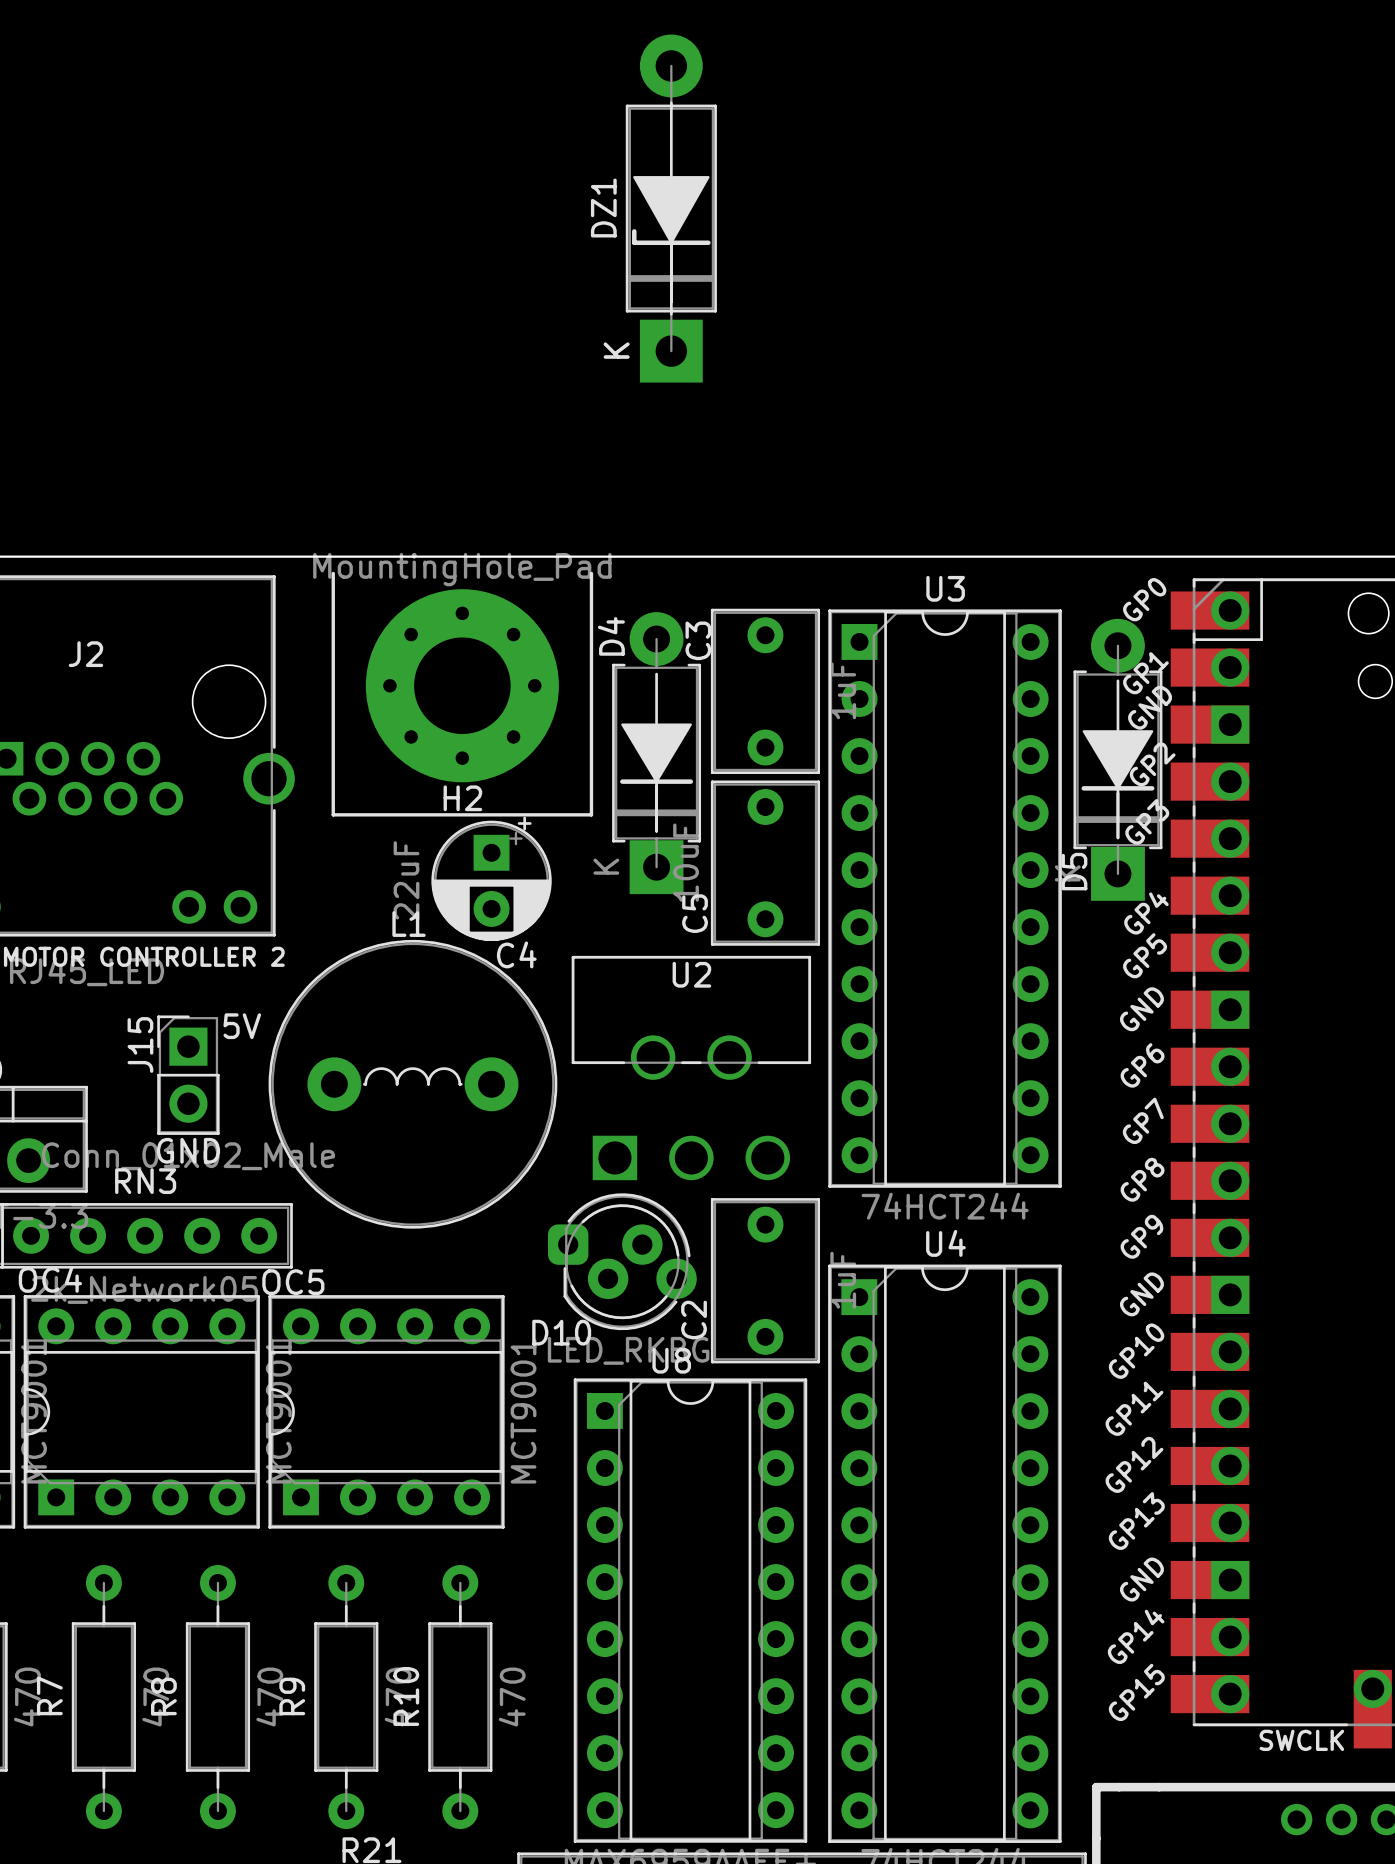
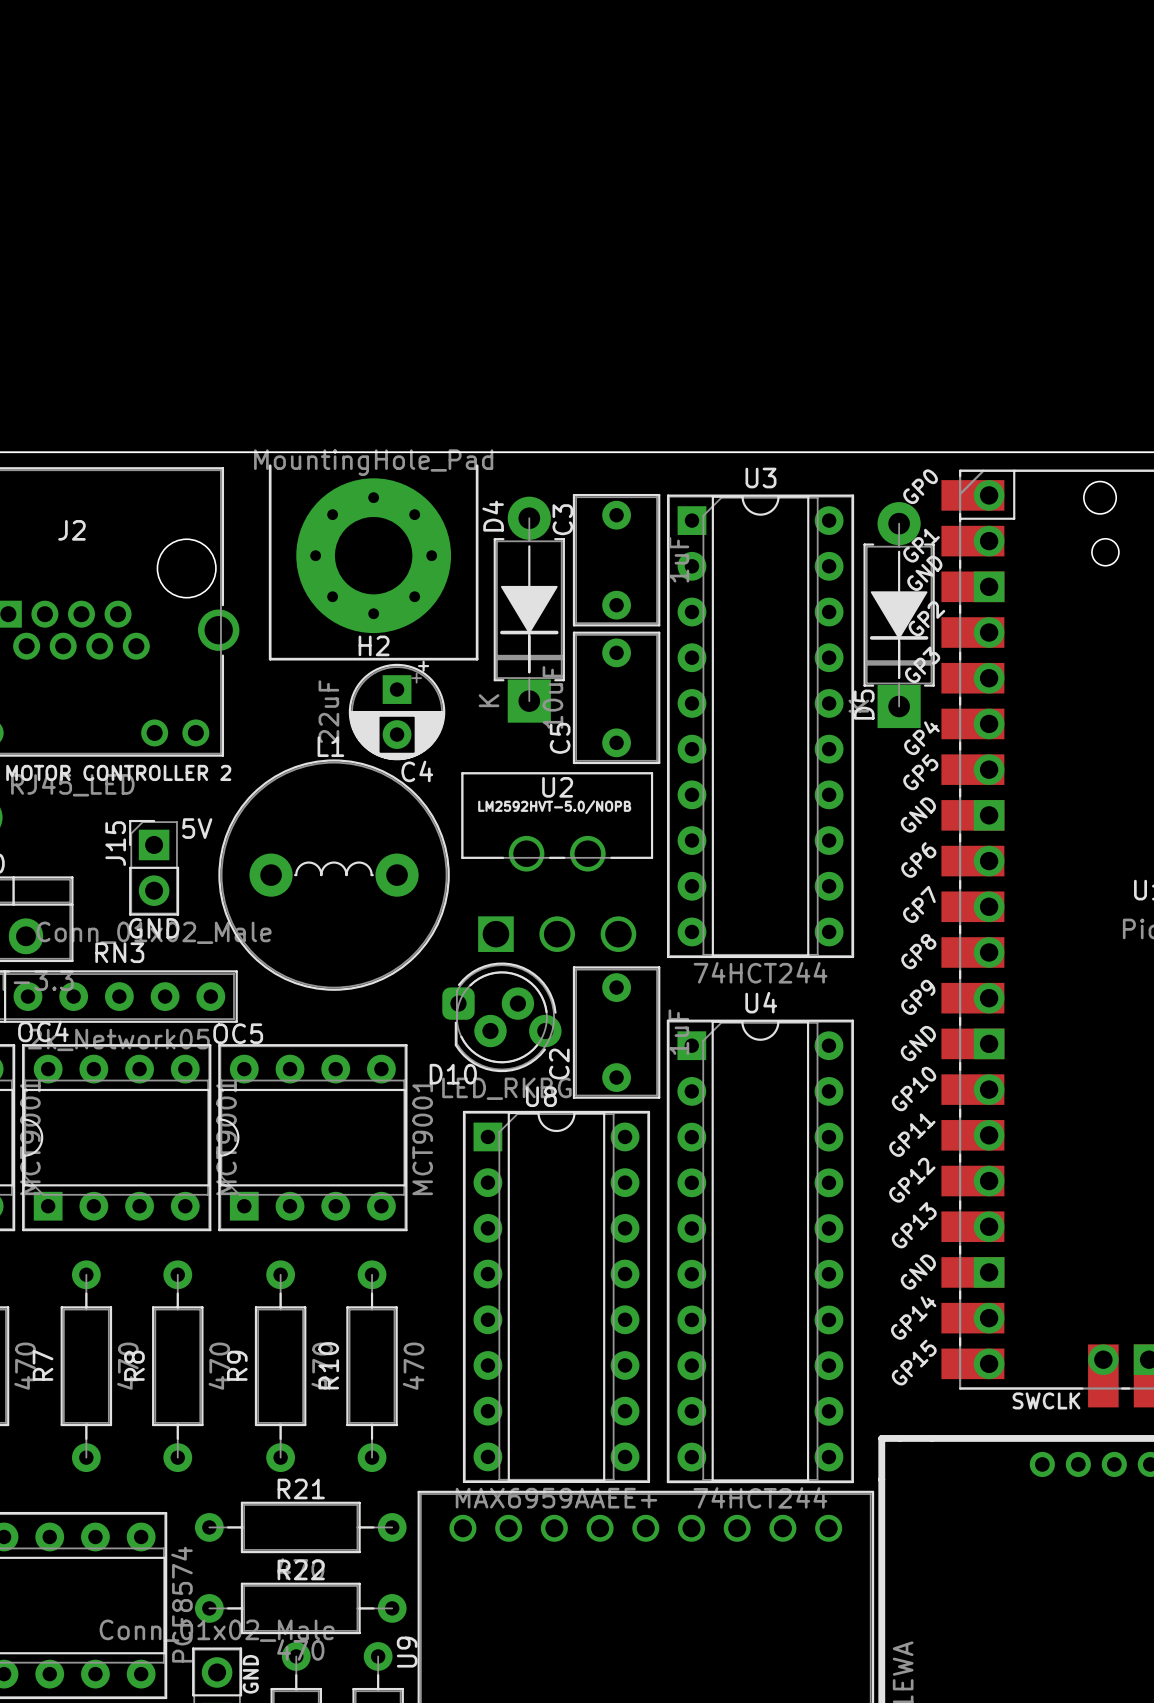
DZ1: (671, 208) -> none
U2 value: none -> LM2592HVT-5.0/NOPB (554, 807)

